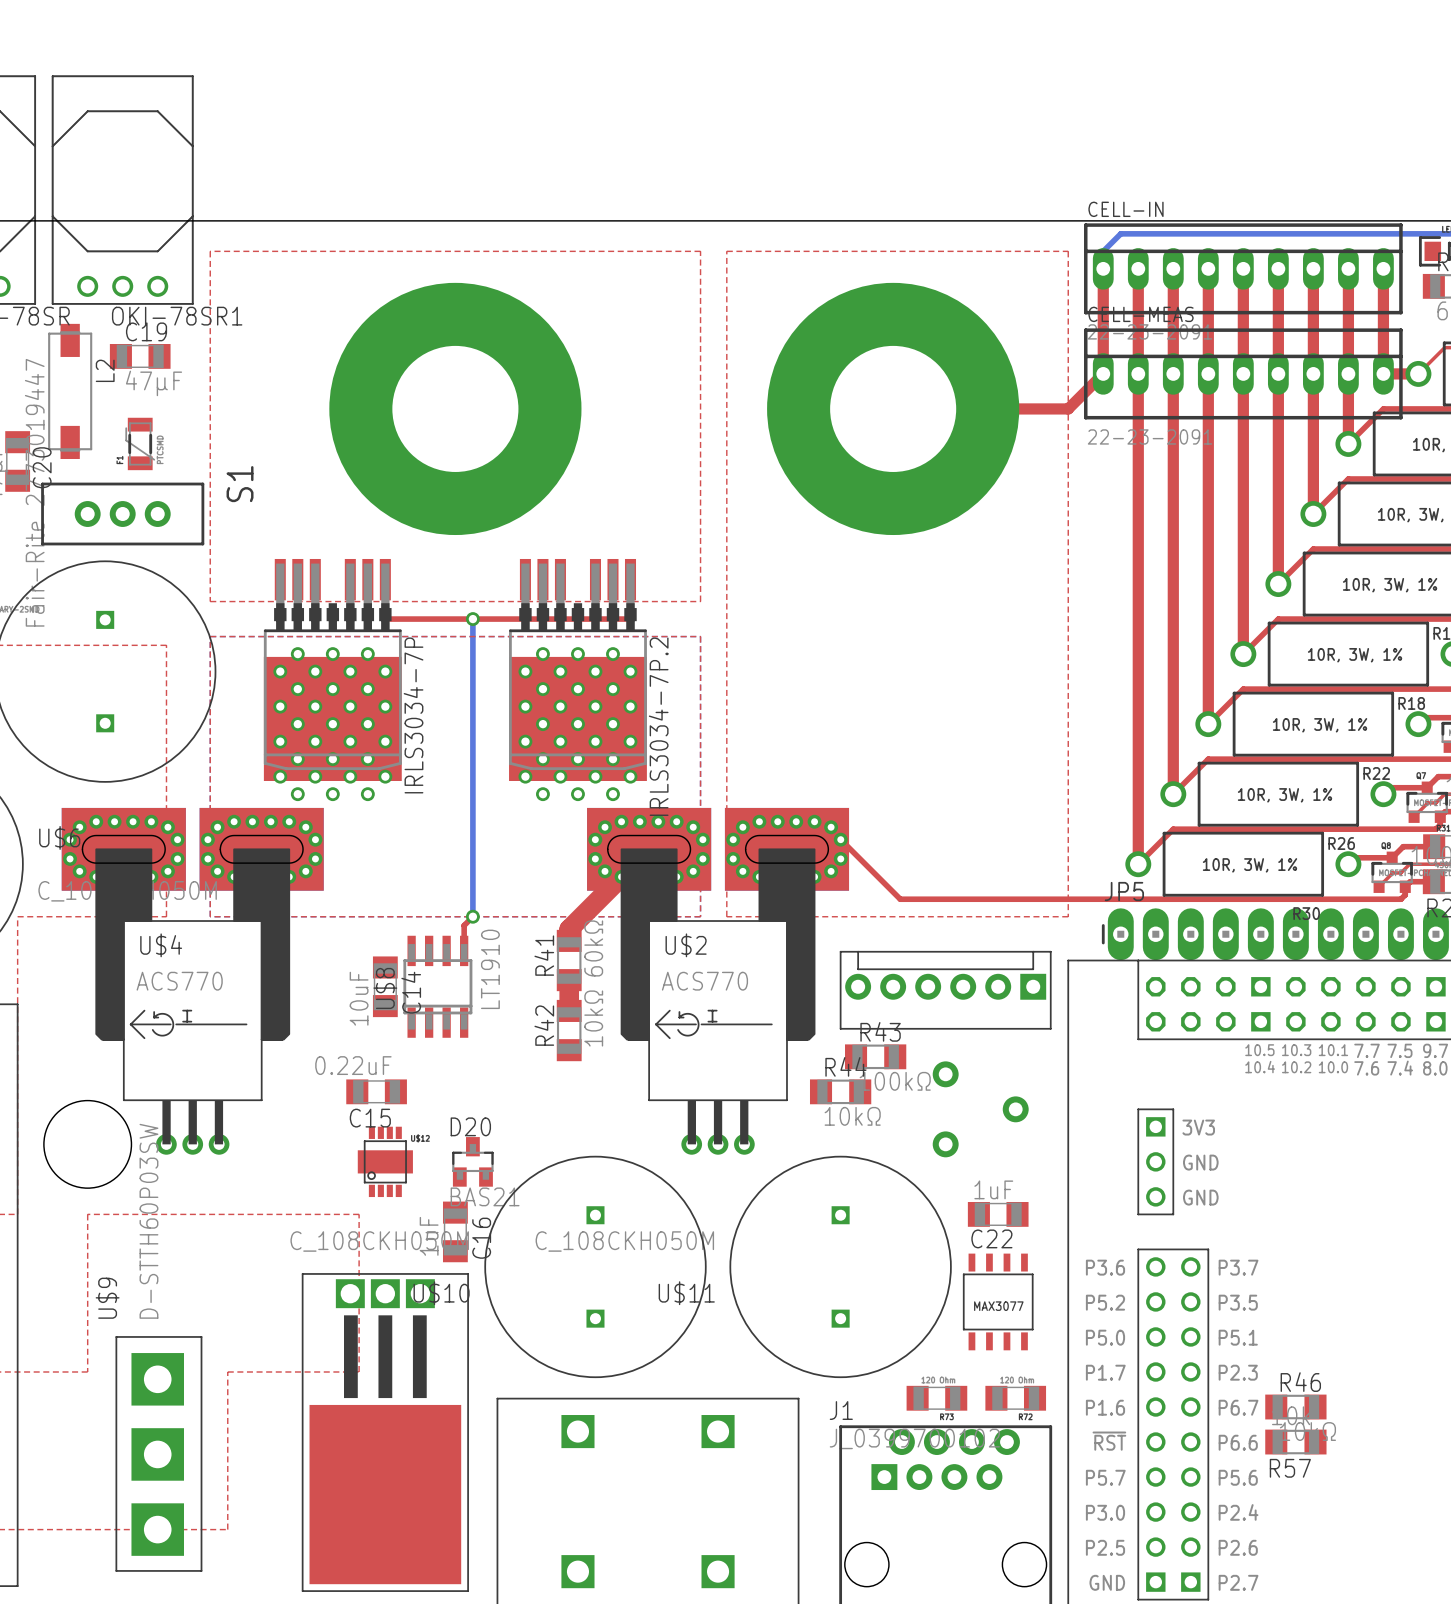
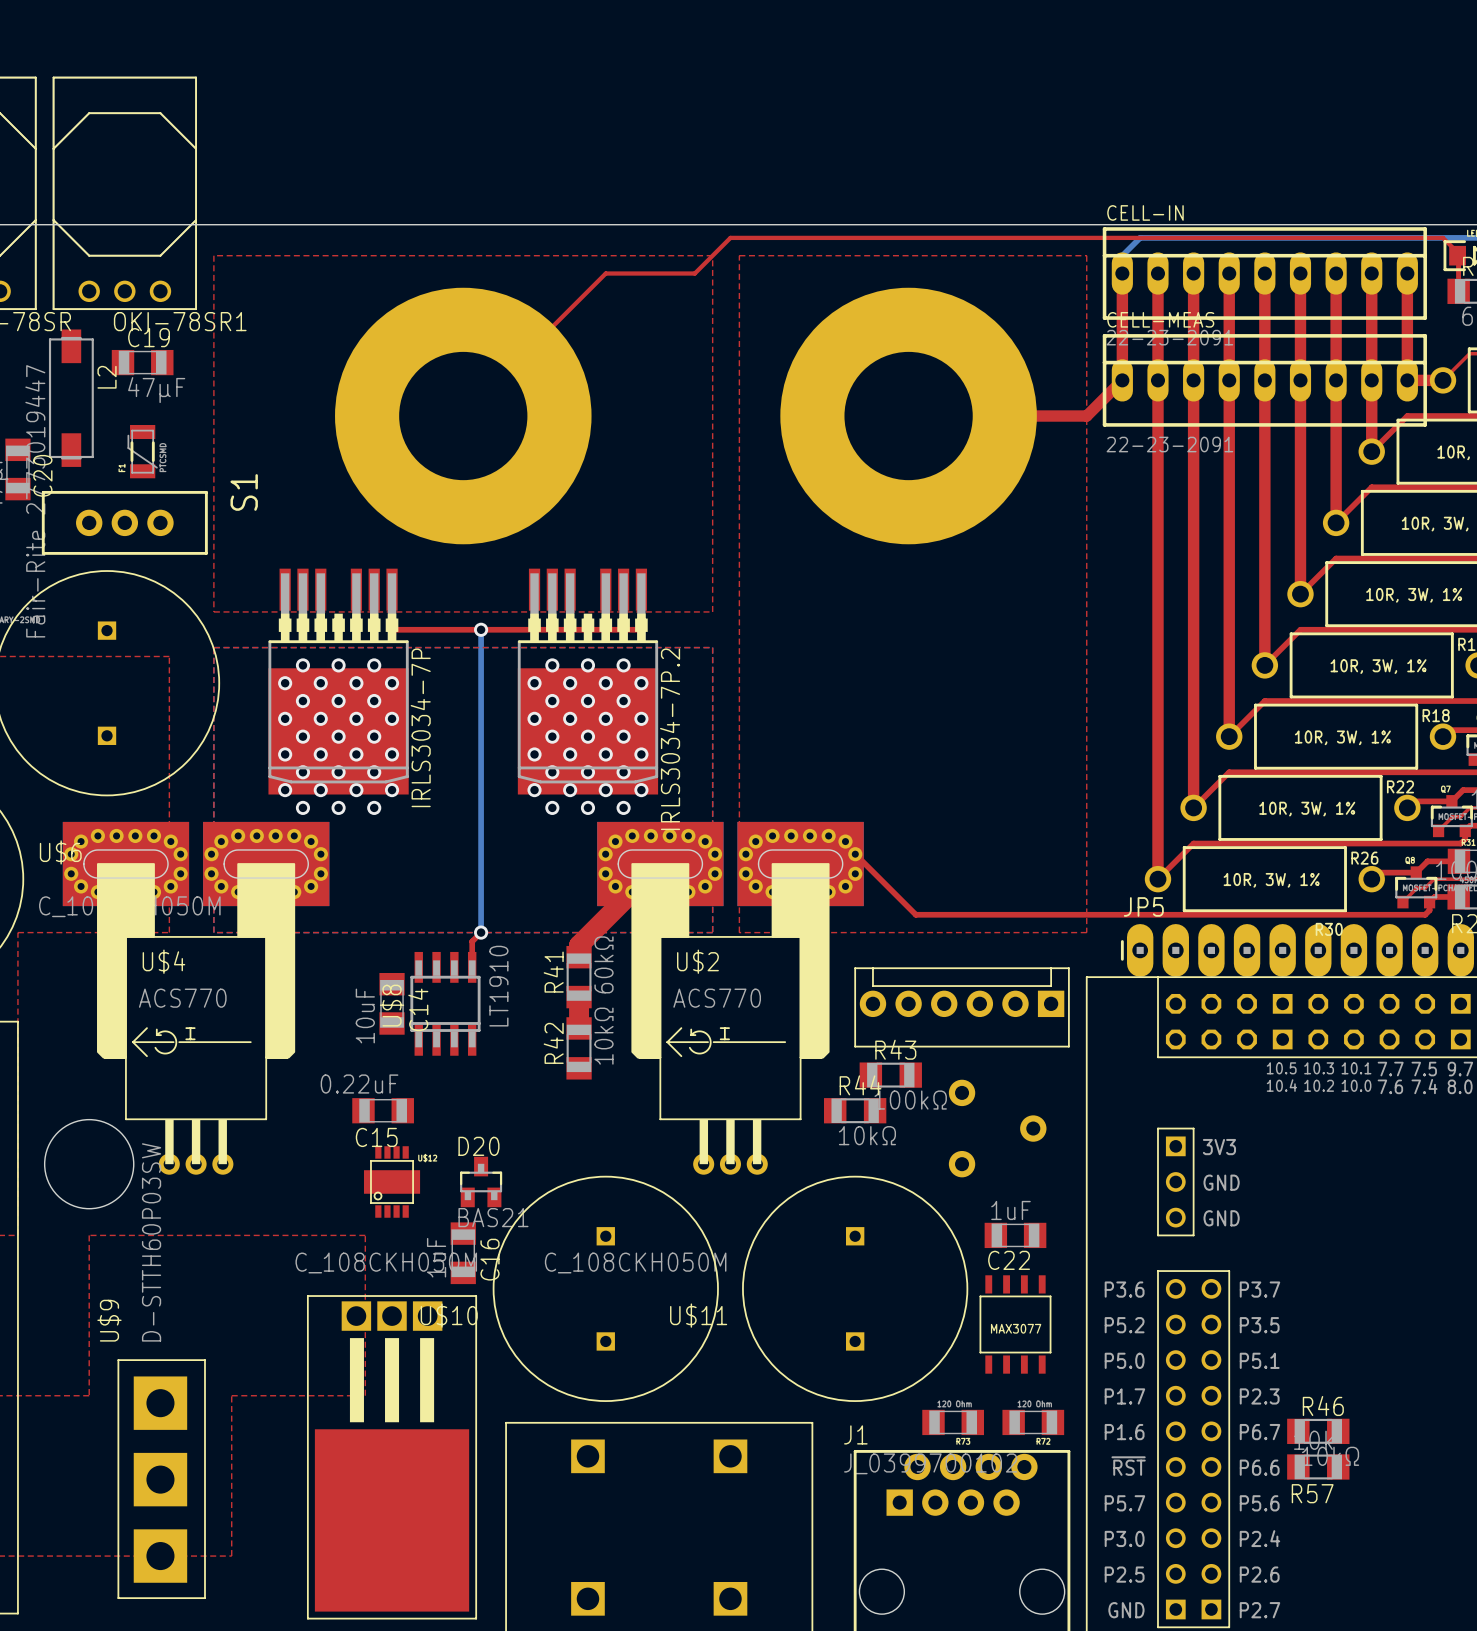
top track: none -> (1458, 291) (1458, 253) (1442, 237) (730, 237) (694, 273) (605, 273) (463, 416)

